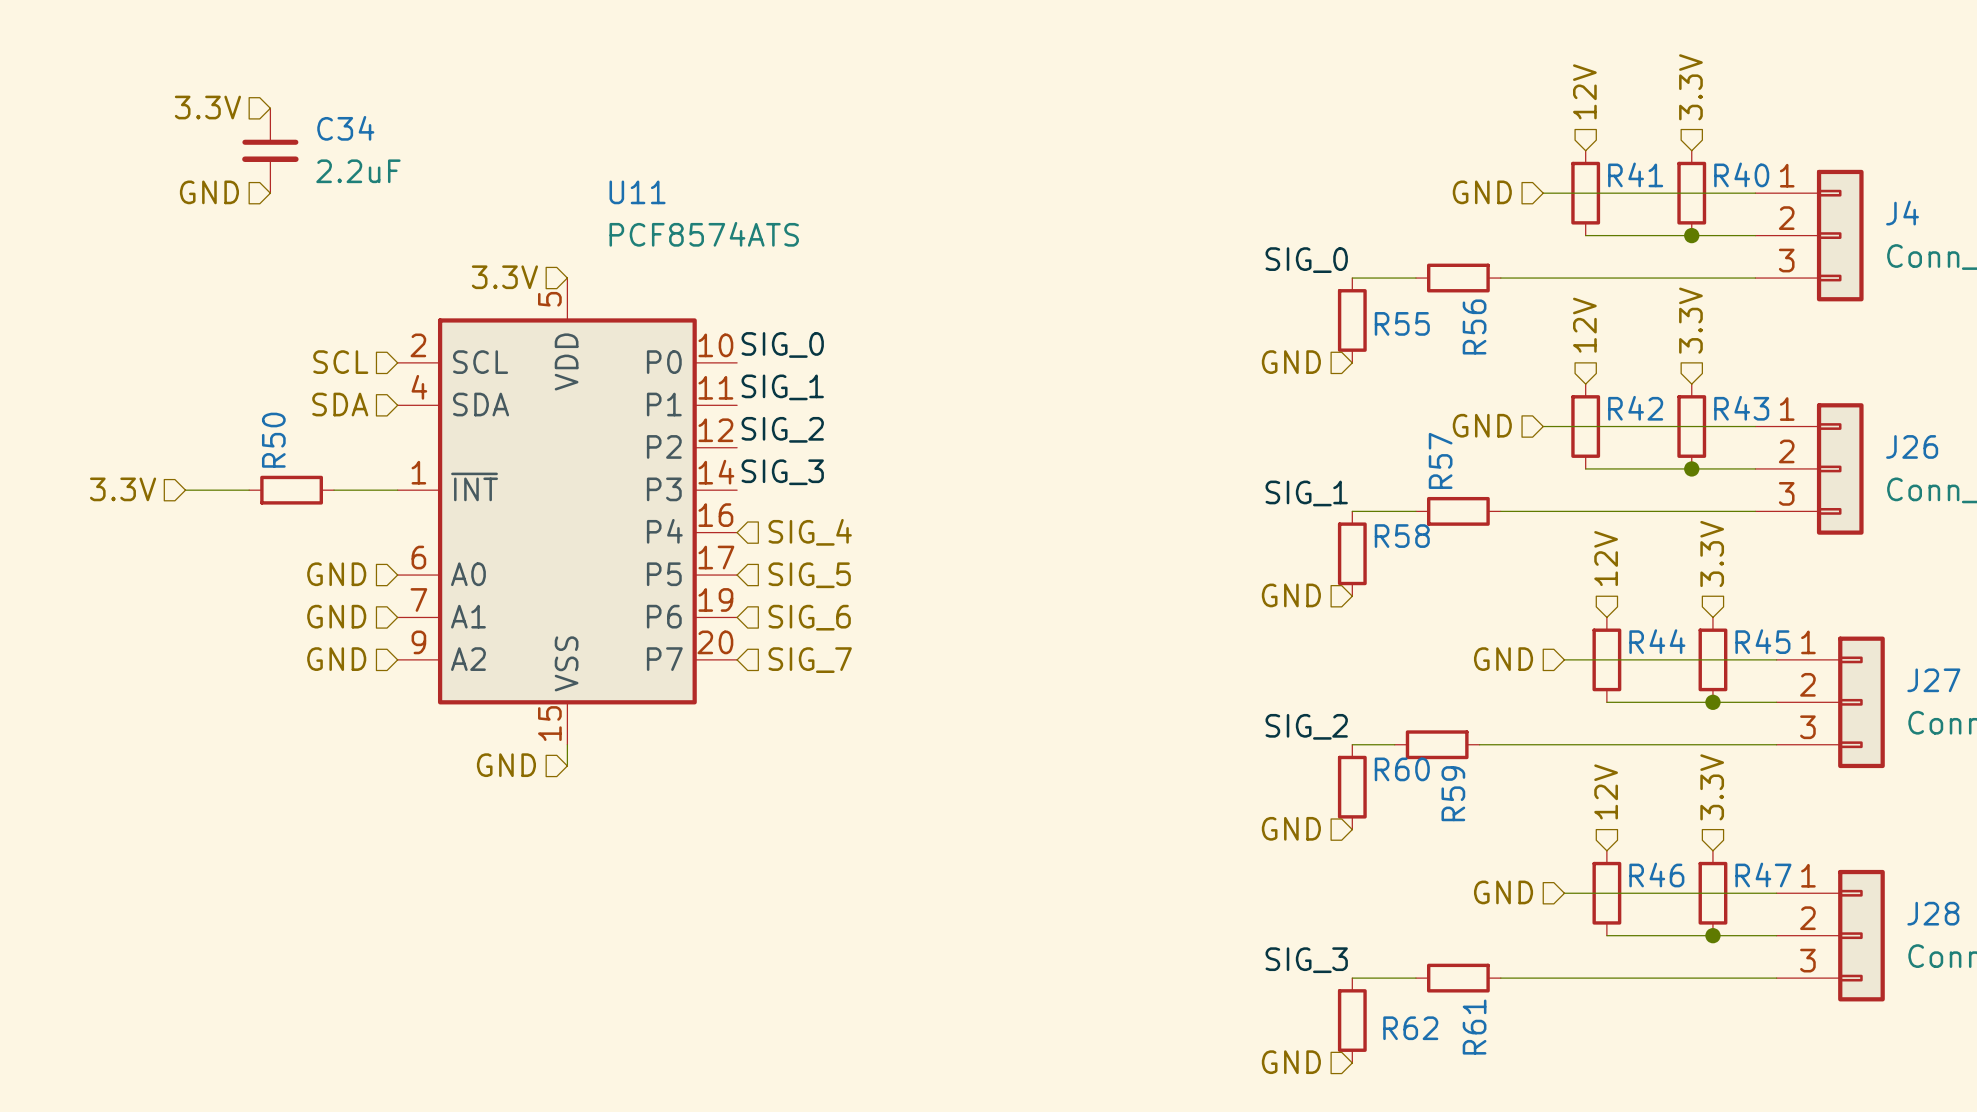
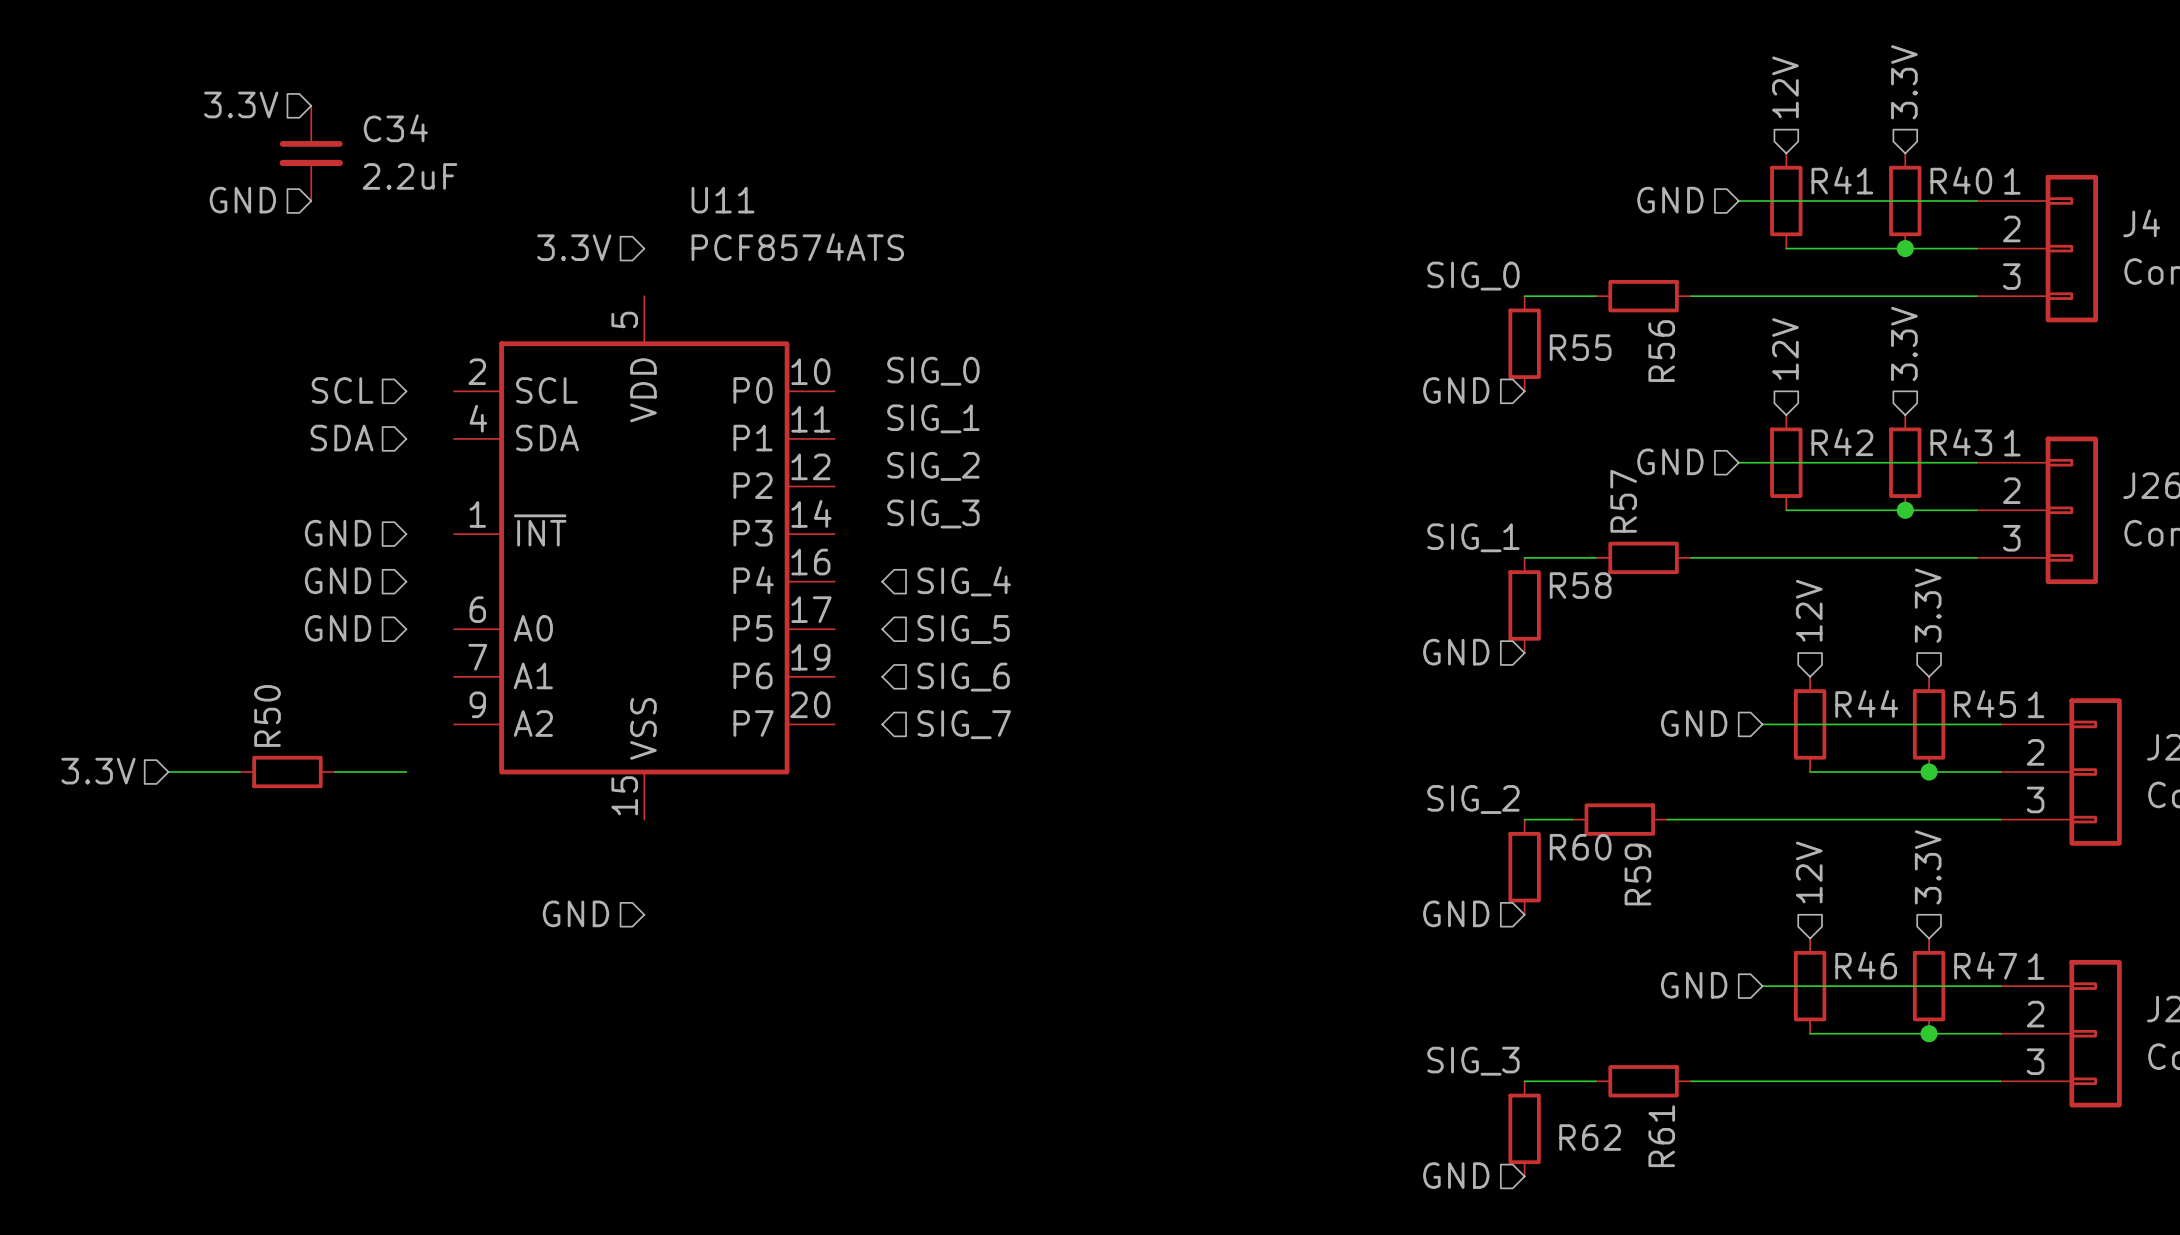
hierarchical label position: 3.3V (504, 277) -> 3.3V (574, 247)
label position: SIG_0 (782, 344) -> SIG_0 (933, 371)
hierarchical label position: SCL (340, 362) -> SCL (342, 390)
label position: SIG_1 (782, 387) -> SIG_1 (933, 418)
hierarchical label position: SDA (340, 404) -> SDA (342, 438)
label position: SIG_2 (782, 429) -> SIG_2 (933, 466)
label position: SIG_3 (782, 472) -> SIG_3 (933, 514)
hierarchical label position: 3.3V (123, 489) -> 3.3V (98, 771)
hierarchical label: none -> GND (338, 533)
wire: (185, 490) (249, 490) -> (168, 772) (239, 772)
R50 position: (291, 490) -> (287, 772)
wire: (334, 490) (397, 490) -> (335, 772) (406, 772)
hierarchical label: none -> GND (338, 580)
hierarchical label position: SIG_4 (810, 532) -> SIG_4 (964, 581)
hierarchical label: none -> GND (338, 628)
hierarchical label: GND (336, 574) -> none
hierarchical label position: SIG_5 (809, 575) -> SIG_5 (963, 629)
hierarchical label: GND (336, 616) -> none
hierarchical label position: SIG_6 (809, 617) -> SIG_6 (963, 677)
hierarchical label: GND (336, 659) -> none
hierarchical label position: SIG_7 (810, 660) -> SIG_7 (964, 724)
wire: (567, 744) (567, 765) -> none
hierarchical label position: GND (506, 765) -> GND (575, 913)

